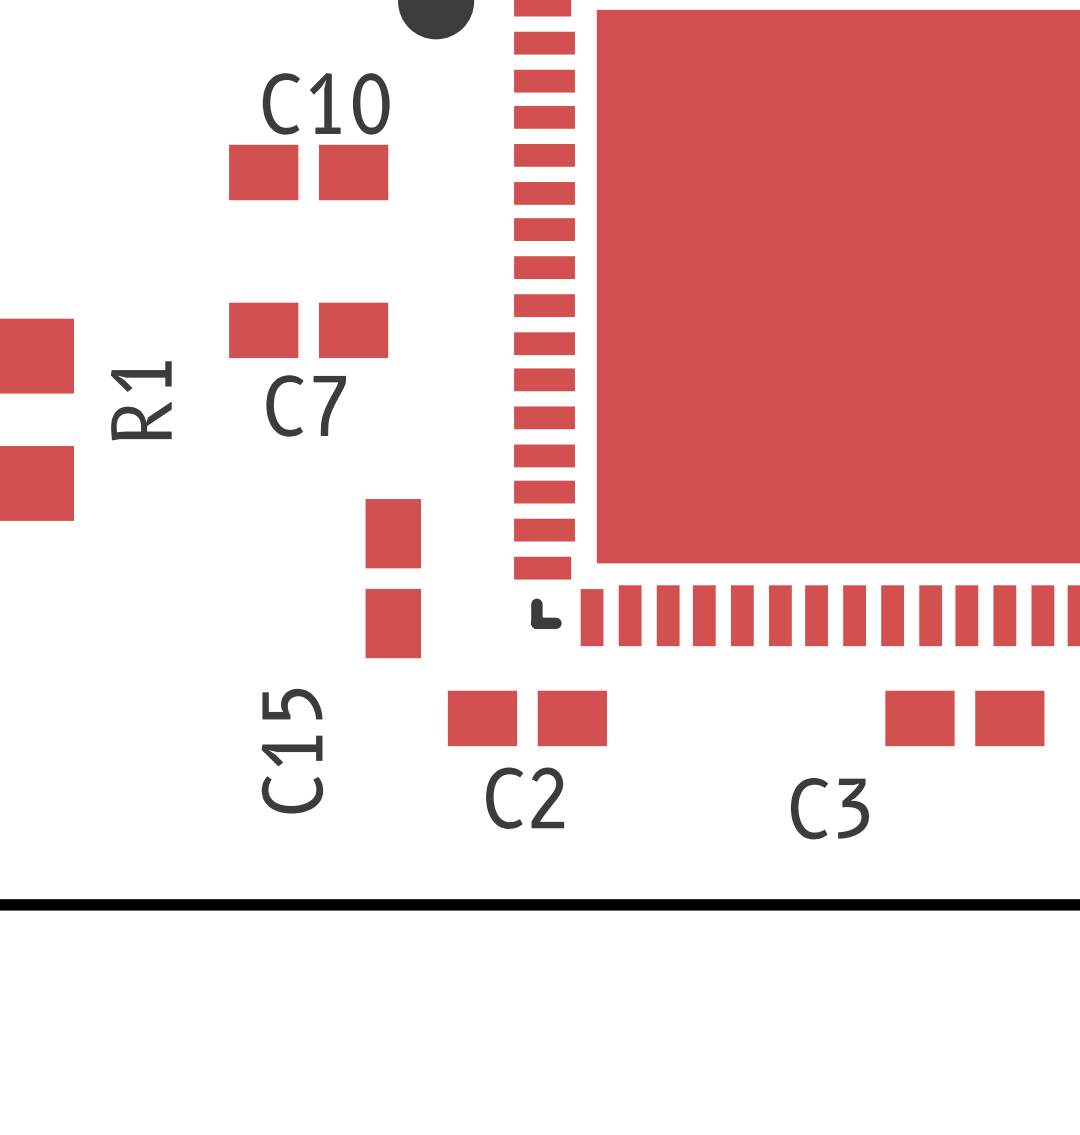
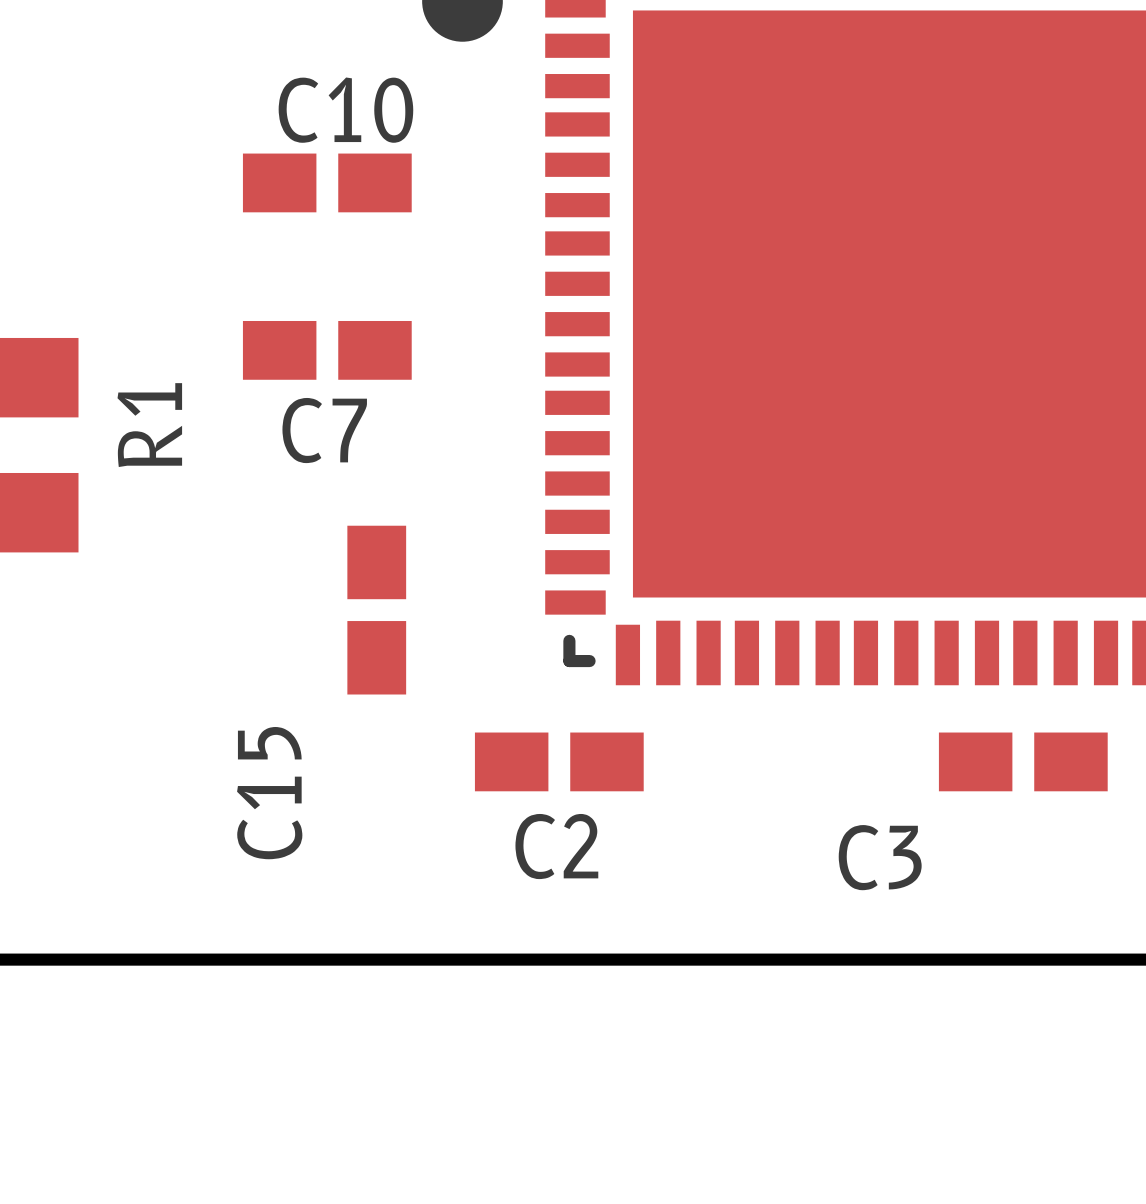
C15 position: (393, 578) -> (376, 610)

